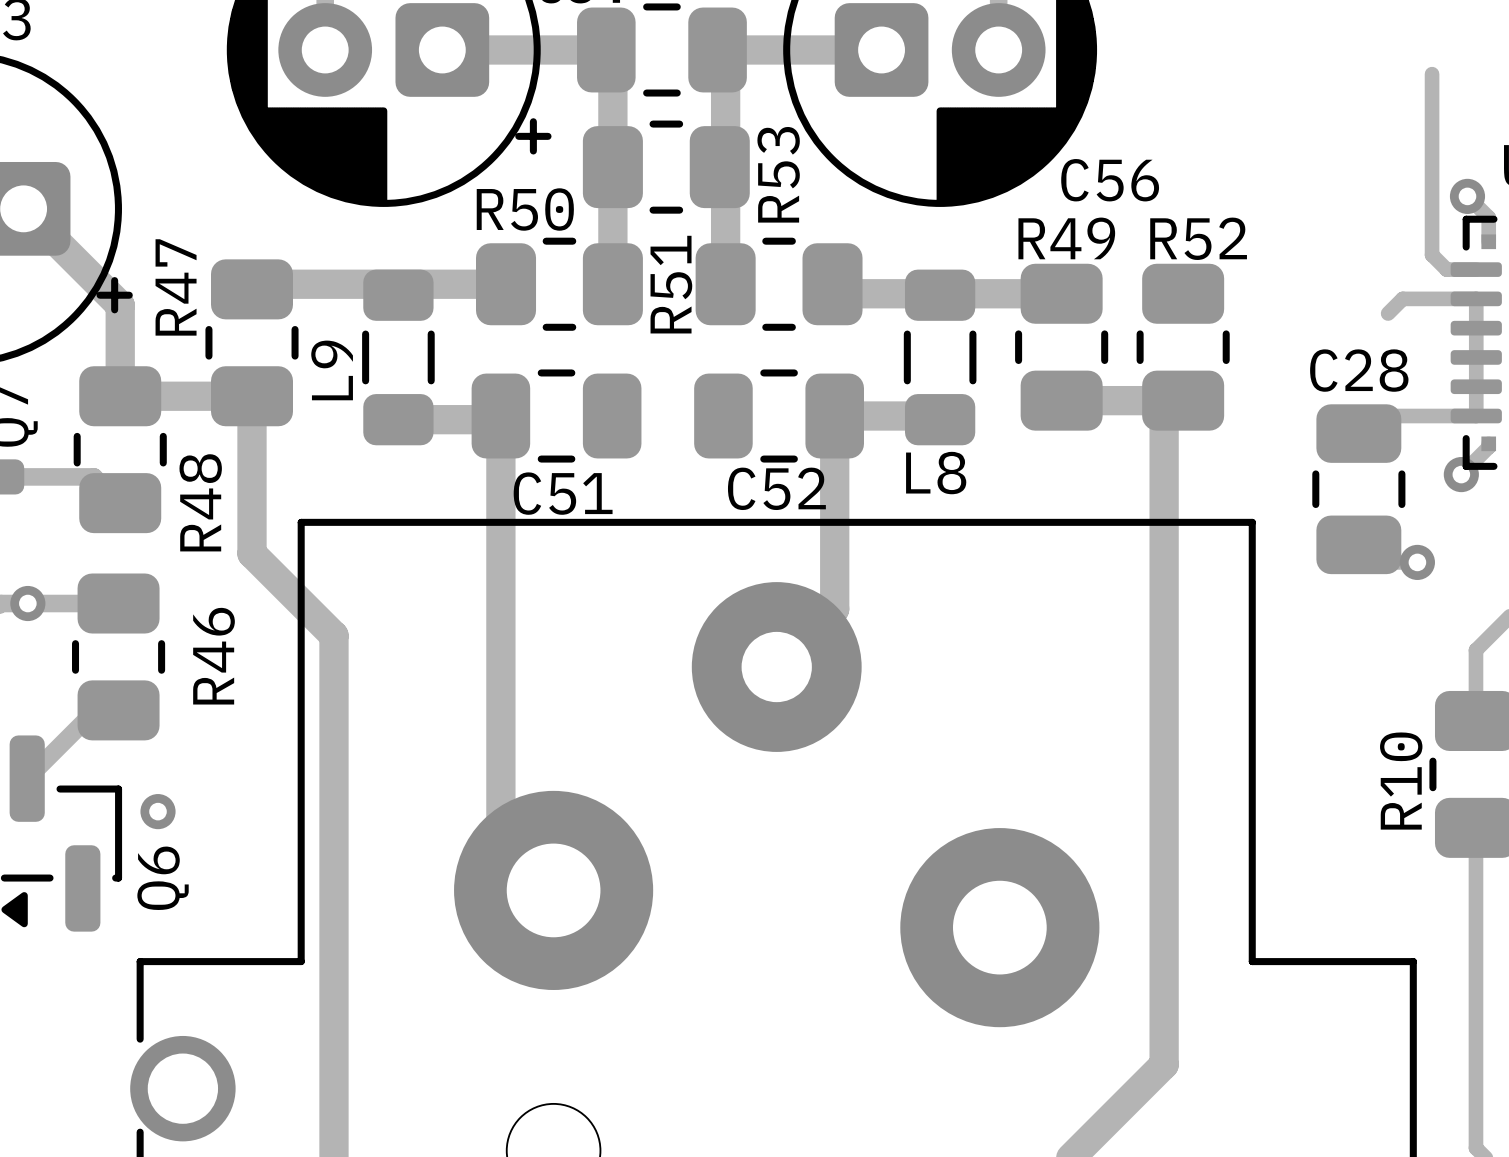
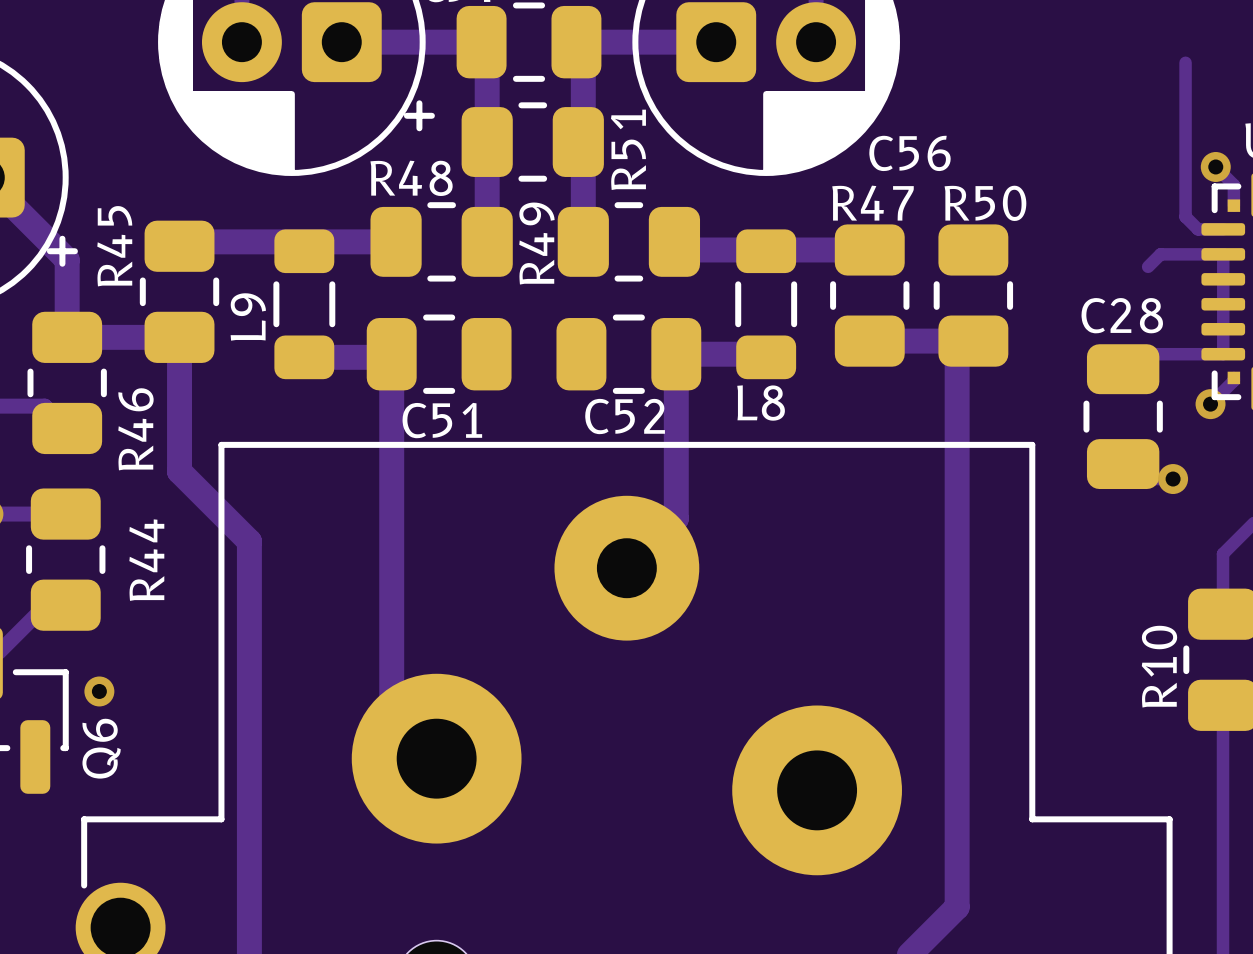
R53 name: R53 (778, 174) -> R51 (628, 149)
R50 name: R50 (525, 209) -> R48 (411, 178)
R49 name: R49 (1066, 238) -> R47 (873, 203)
R52 name: R52 (1198, 238) -> R50 (985, 203)
R51 name: R51 (671, 284) -> R49 (536, 243)
R47 name: R47 (176, 287) -> R45 (114, 246)
R48 name: R48 (200, 502) -> R46 (135, 429)
R46 name: R46 (214, 656) -> R44 (146, 560)

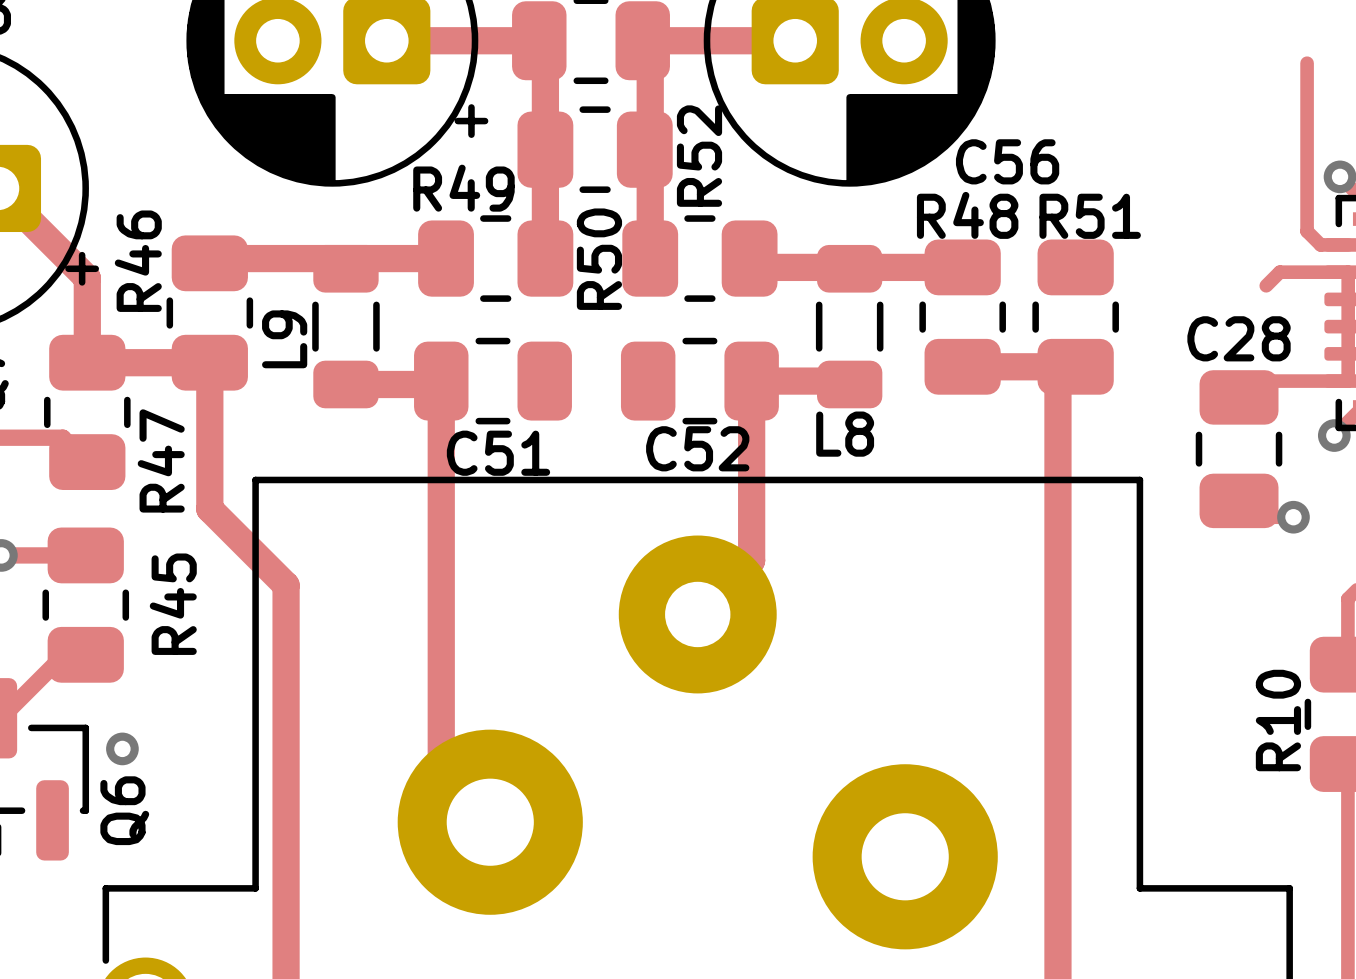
R51 name: R51 (628, 149) -> R52 (699, 156)
R48 name: R48 (411, 178) -> R49 (463, 188)
R47 name: R47 (873, 203) -> R48 (967, 215)
R50 name: R50 (985, 203) -> R51 (1090, 216)
R49 name: R49 (536, 243) -> R50 (599, 259)
R45 name: R45 (114, 246) -> R46 (138, 261)
R46 name: R46 (135, 429) -> R47 (161, 460)
R44 name: R44 (146, 560) -> R45 (173, 604)

